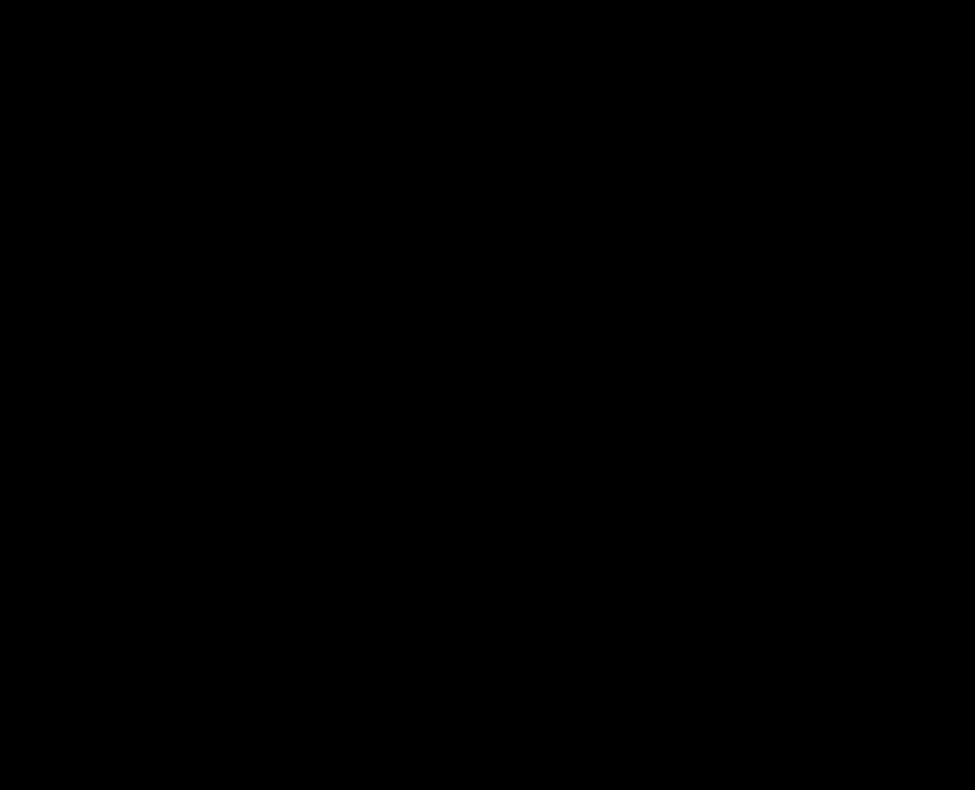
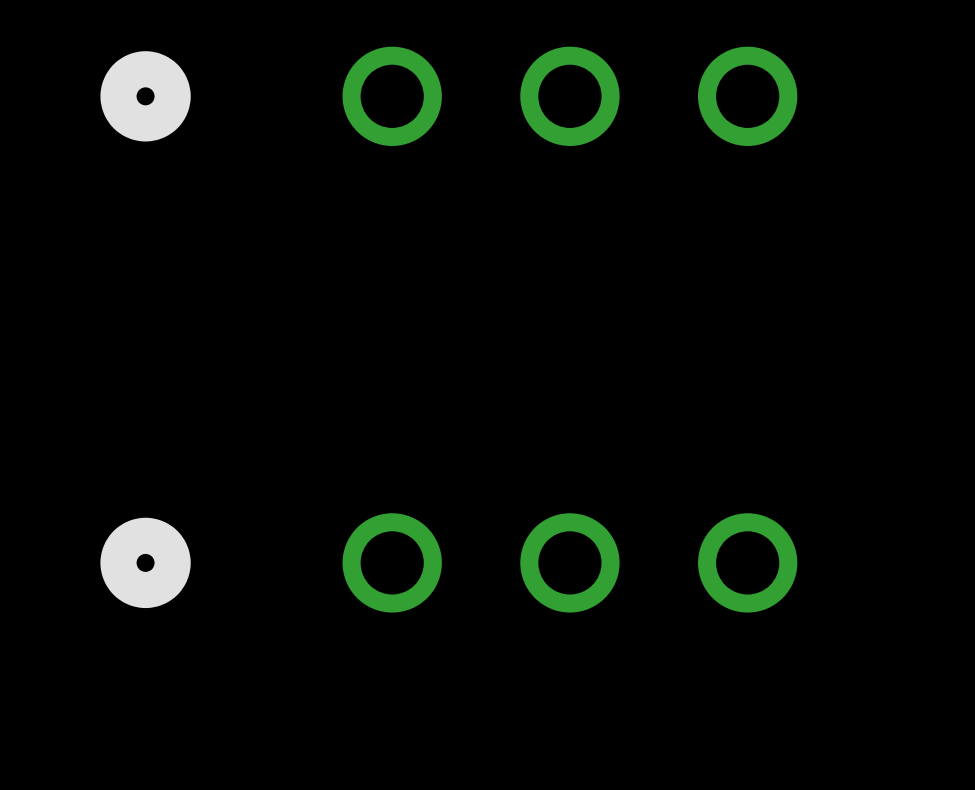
part: none -> (448, 96)
part: none -> (448, 562)

